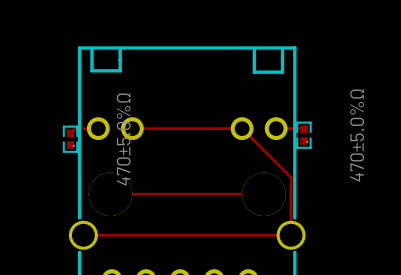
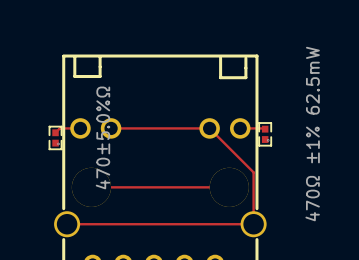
part value: 470±5.0%Ω (357, 135) -> 470Ω ±1% 62.5mW (312, 134)

